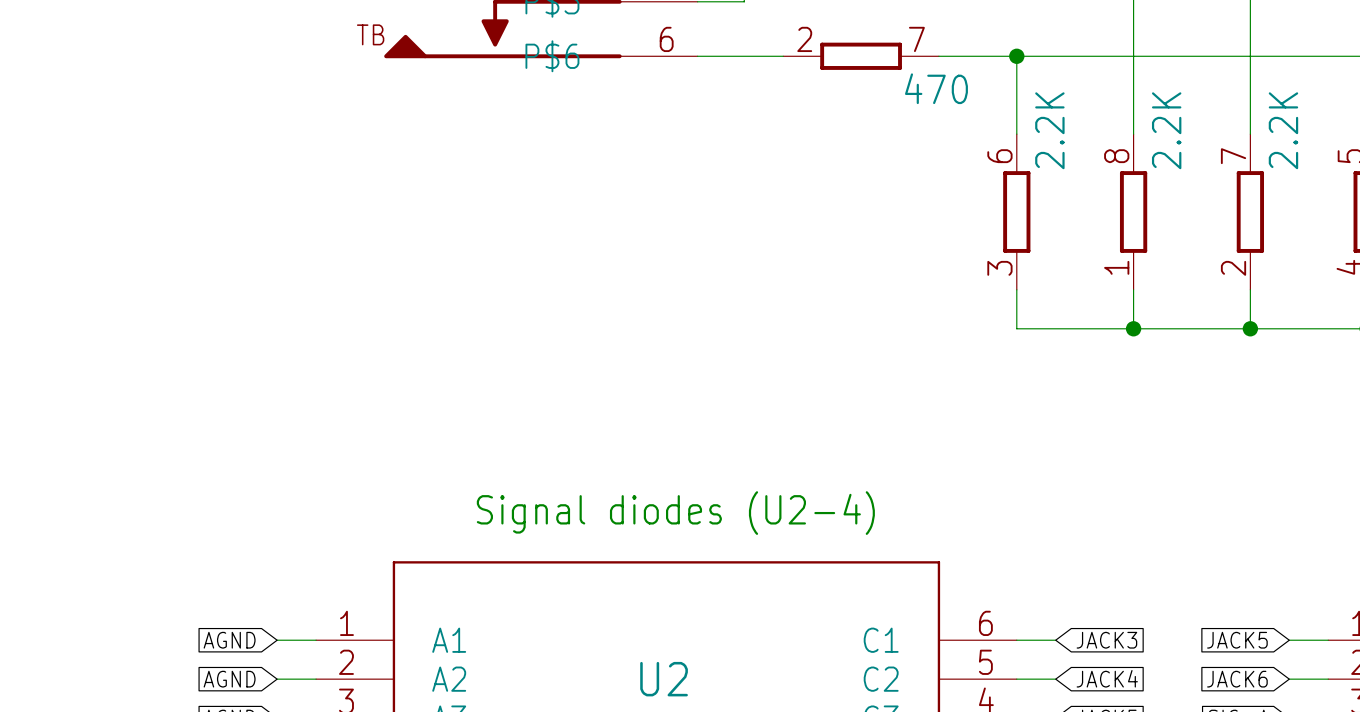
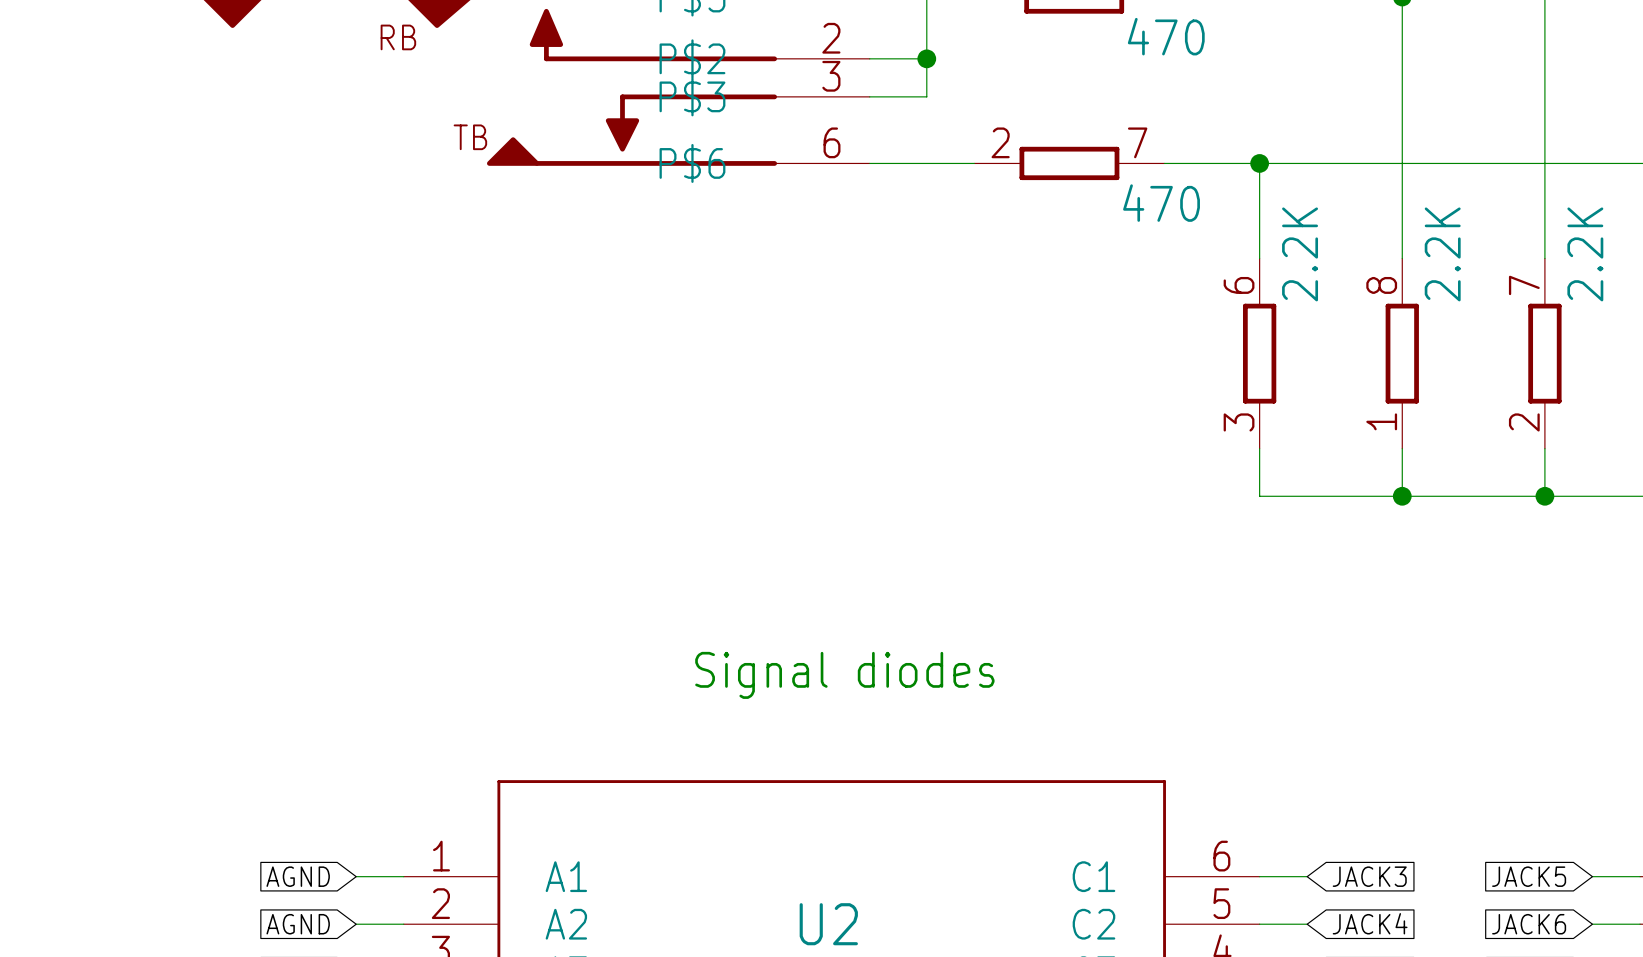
text: Signal diodes (U2-4) (675, 513) -> Signal diodes (844, 675)

